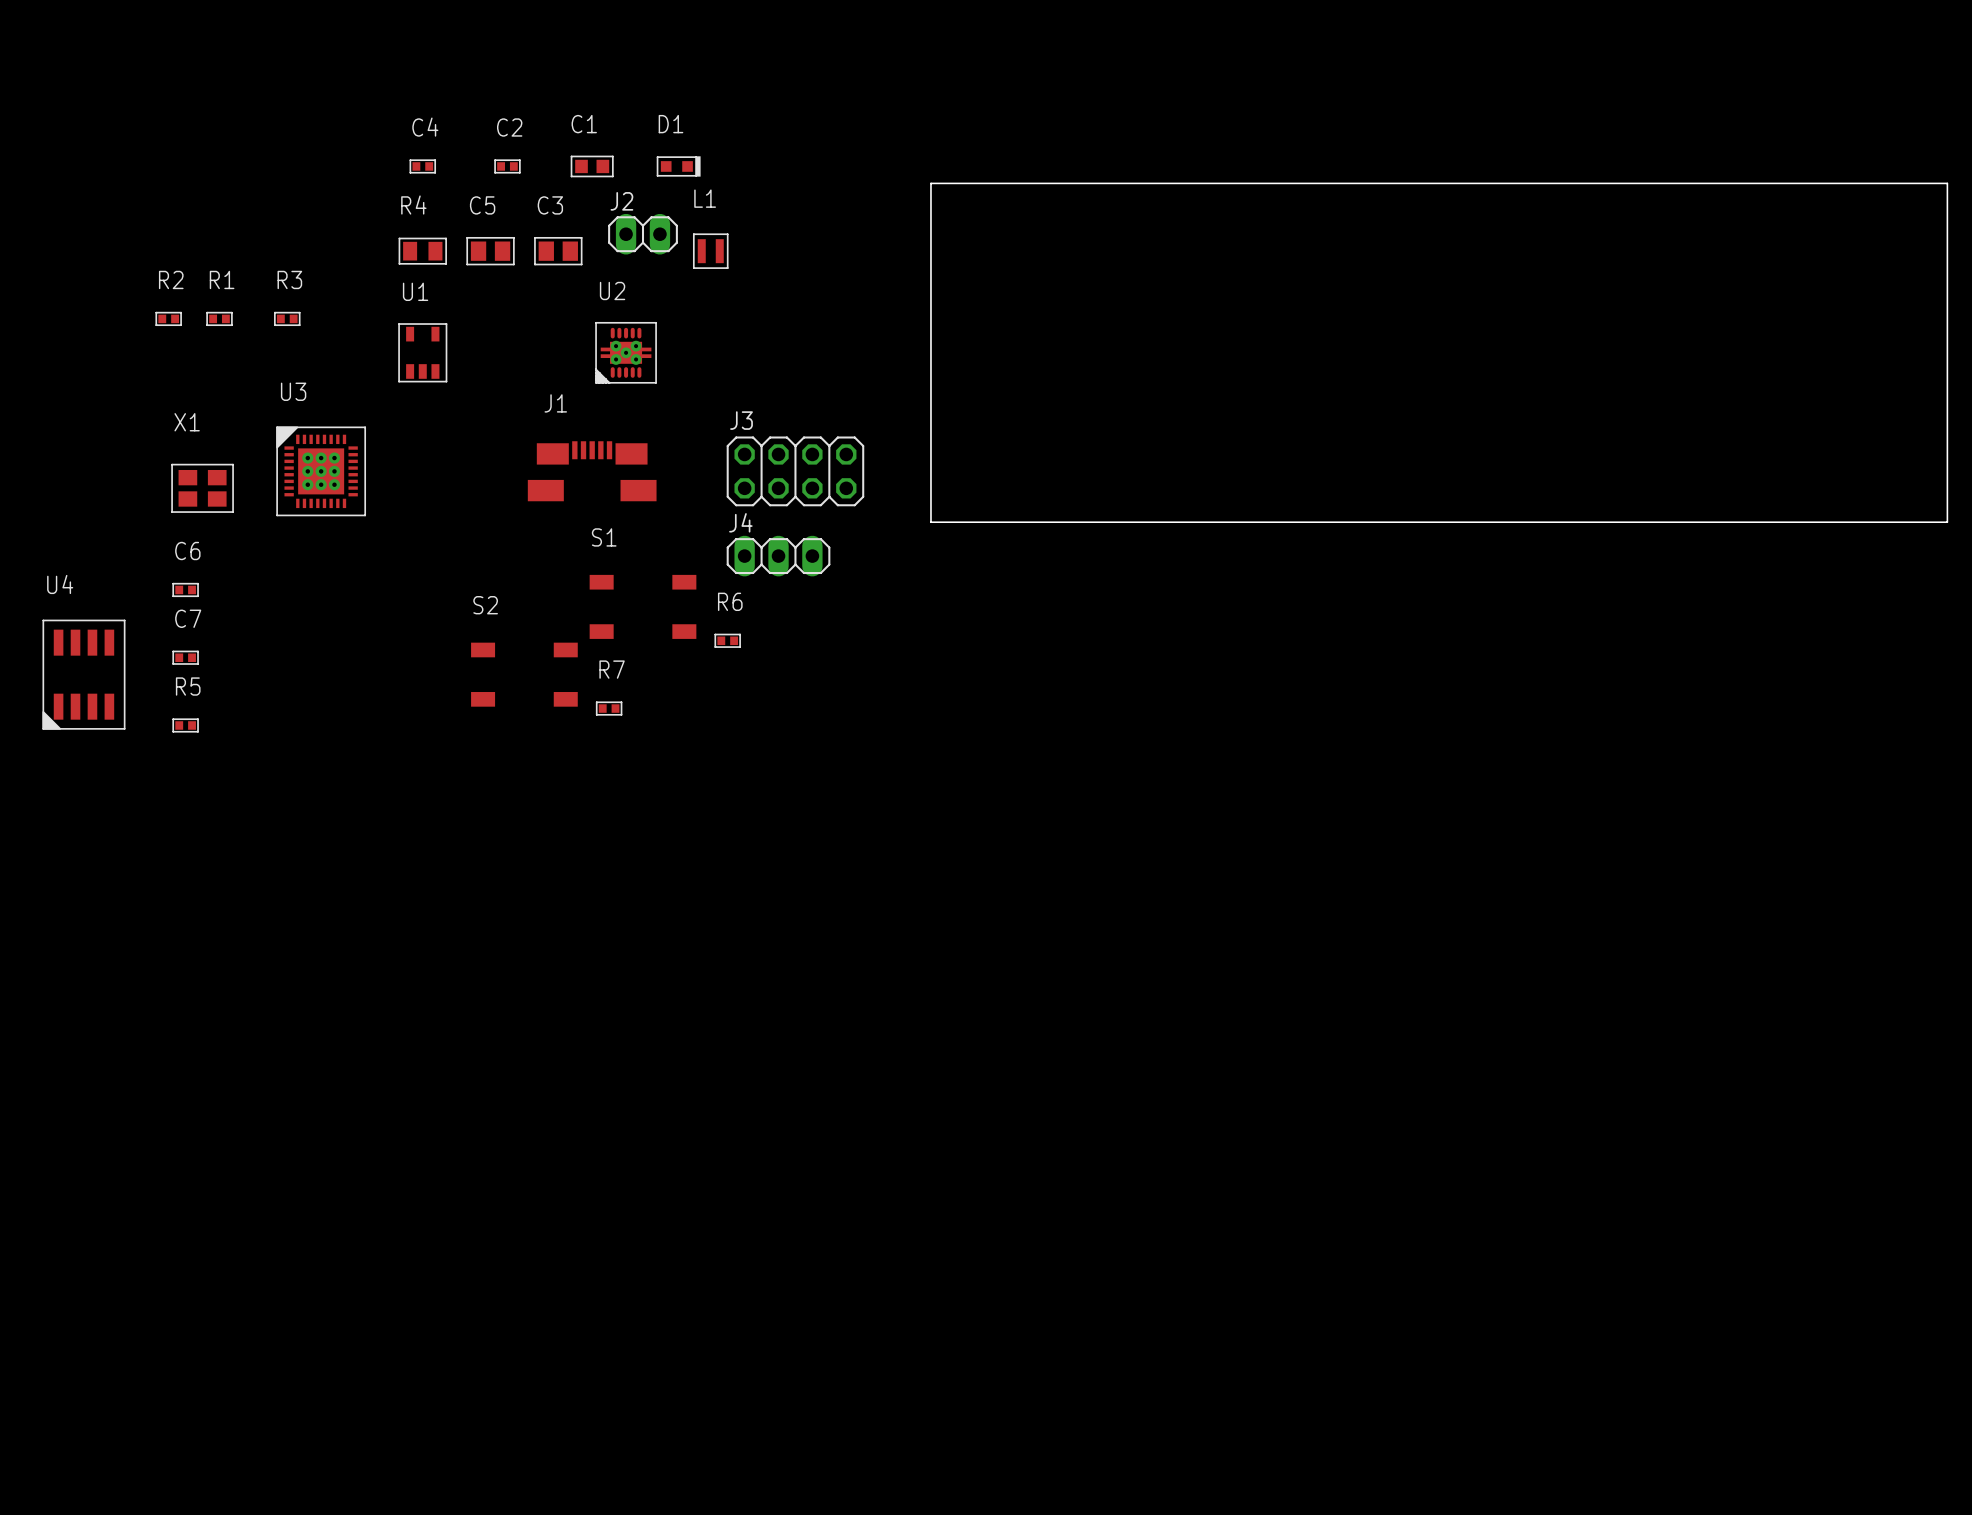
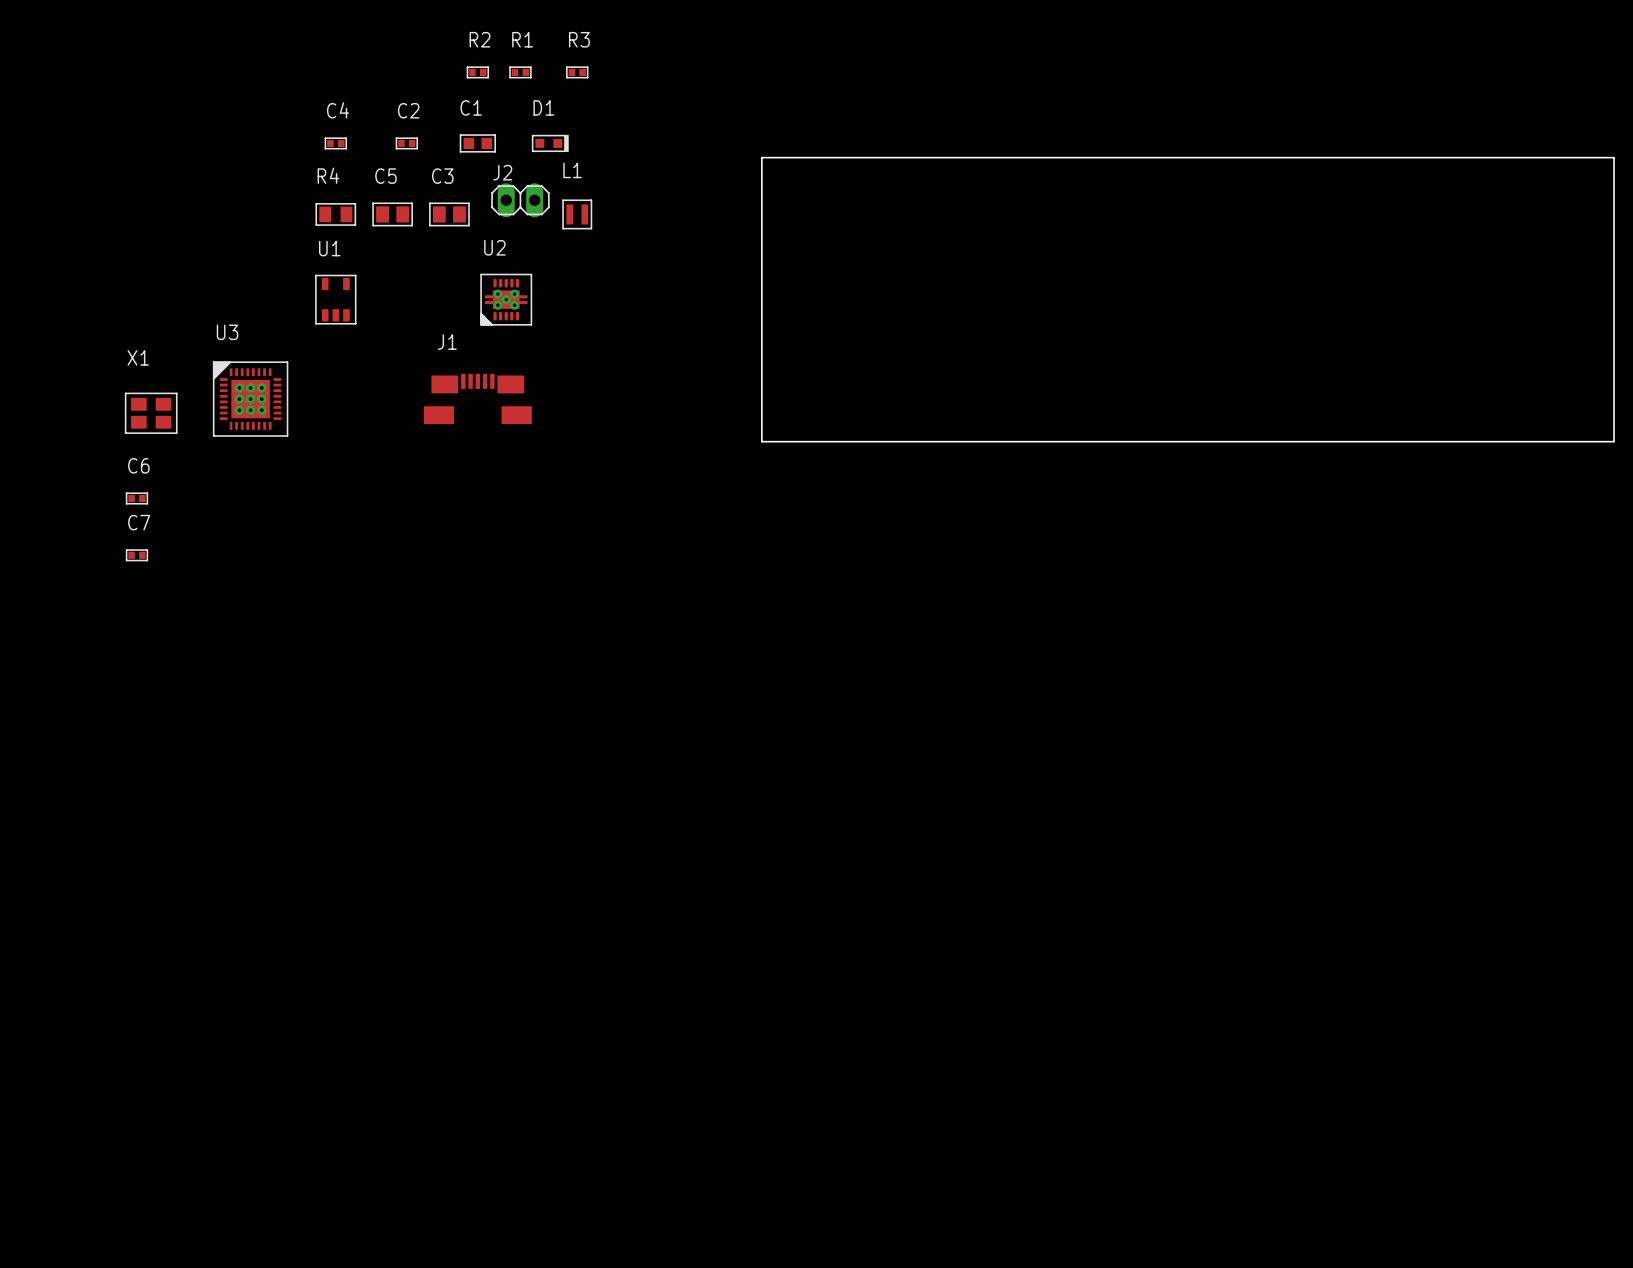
R2 position: (168, 318) -> (477, 72)
R1 position: (219, 318) -> (520, 72)
R3 position: (287, 318) -> (577, 72)
J3: (795, 471) -> none
J4: (778, 556) -> none
S1: (643, 606) -> none
R6: (727, 640) -> none
U4: (83, 674) -> none
S2: (524, 674) -> none
R7: (609, 708) -> none
R5: (185, 725) -> none

